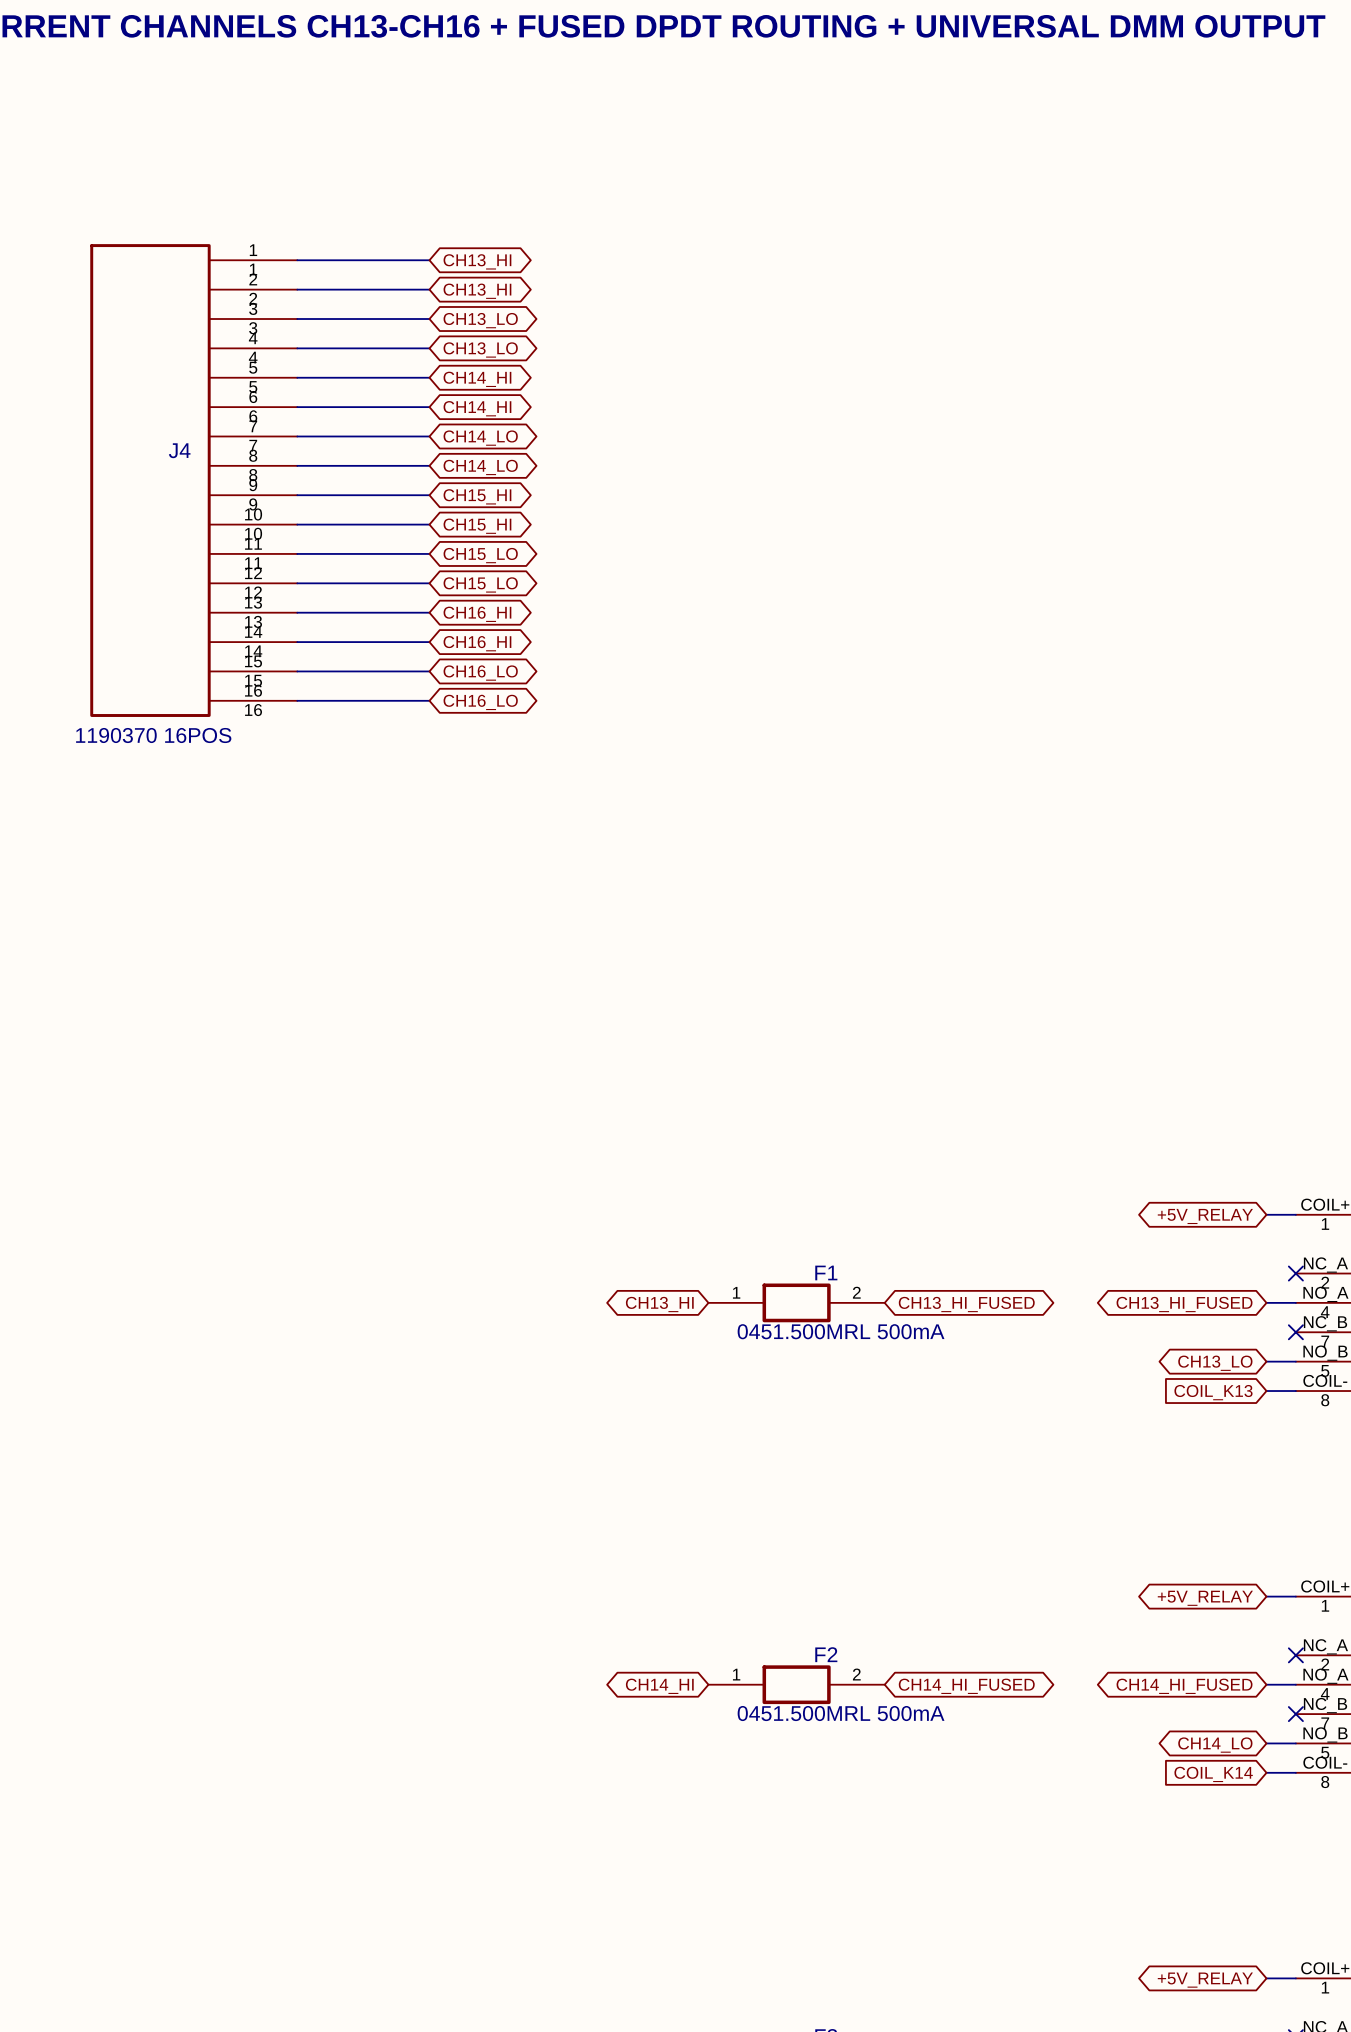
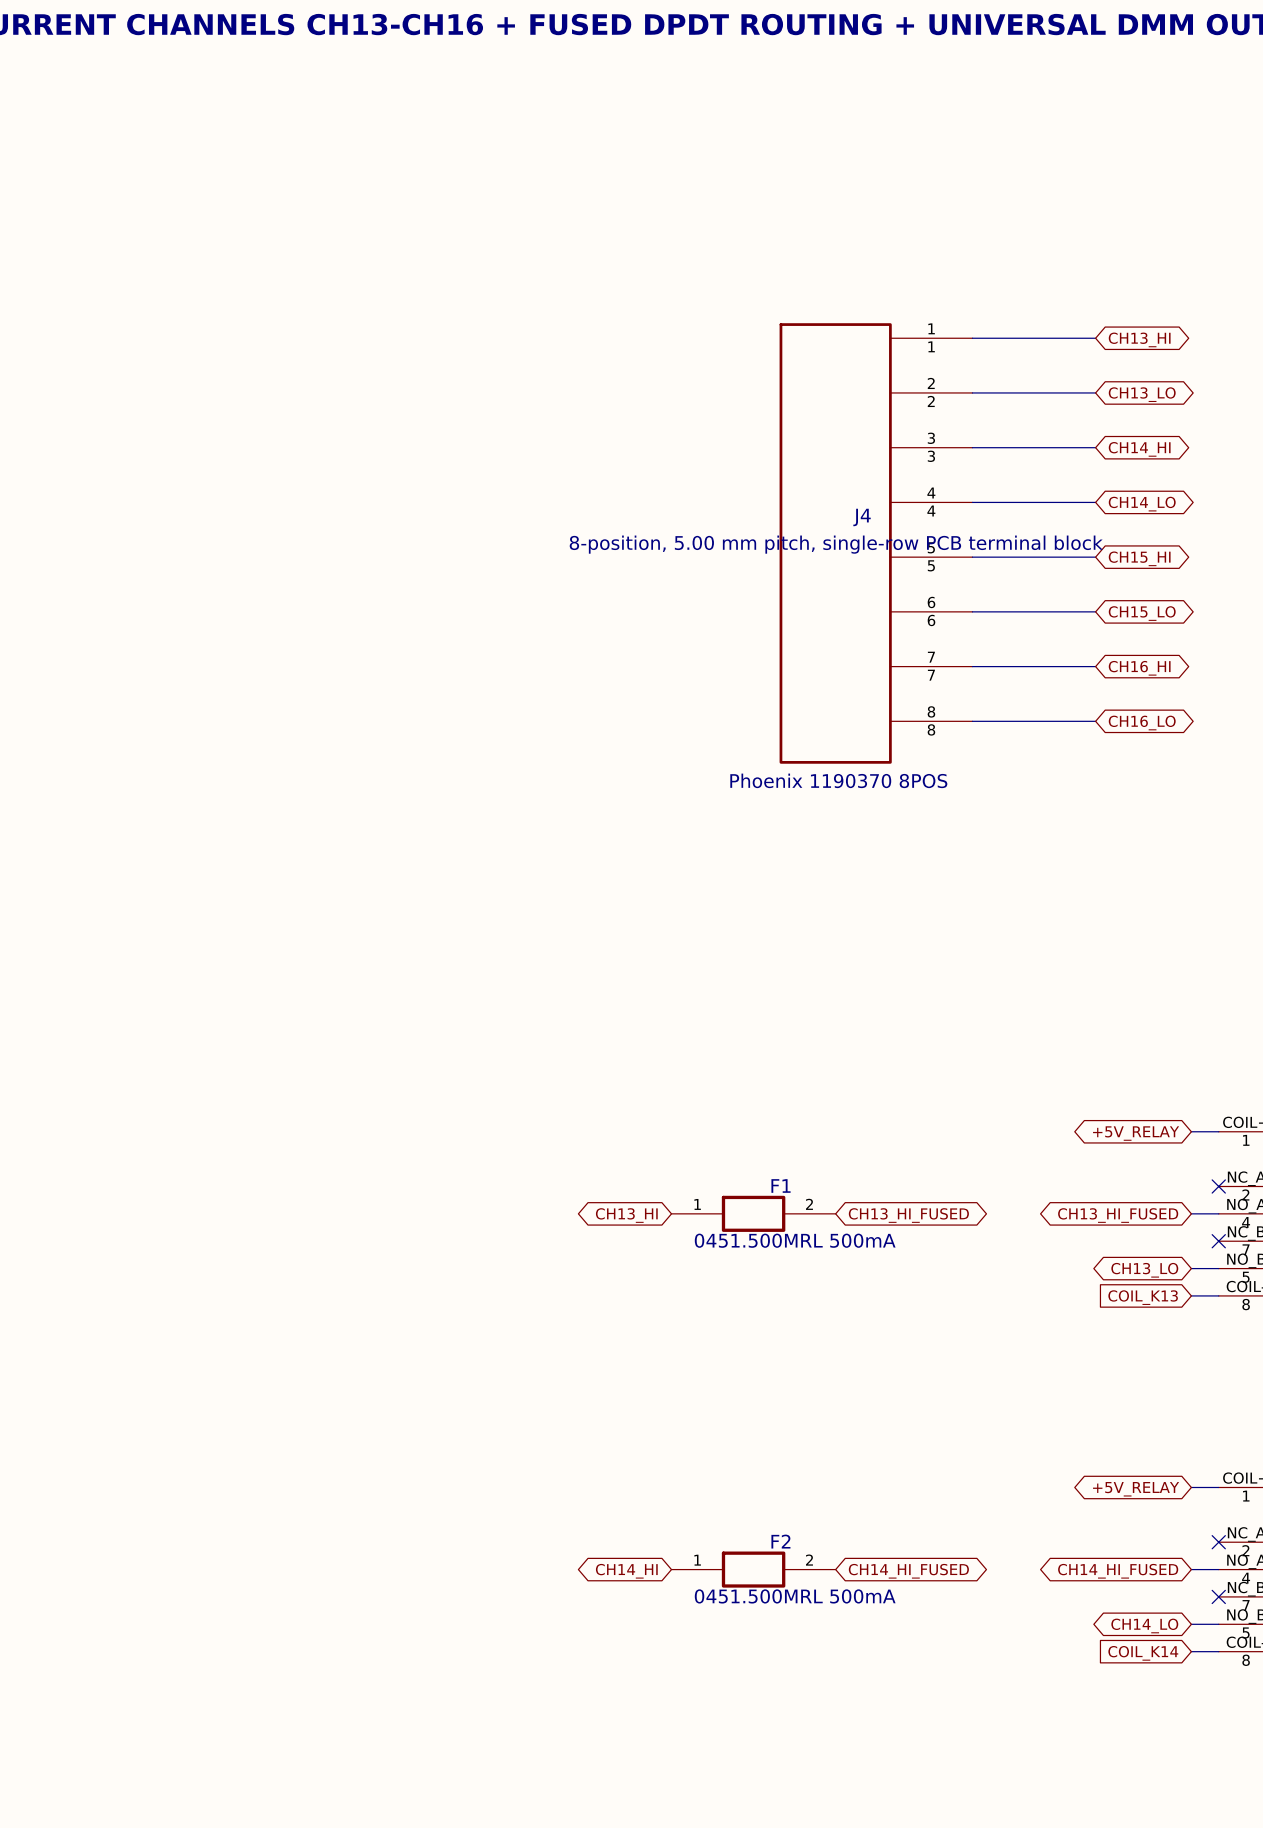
J4 symbol: [90, 244, 298, 717] -> [779, 323, 973, 764]
wire: (297, 260) (429, 260) -> none
global label: CH13_HI (477, 261) -> none
wire: (297, 289) (429, 289) -> none
global label: CH13_HI (477, 291) -> none
wire: (297, 319) (429, 319) -> none
global label: CH13_LO (480, 320) -> none
wire: (297, 348) (429, 348) -> none
global label: CH13_LO (480, 349) -> none
wire: none -> (972, 338) (1095, 338)
global label: none -> CH13_HI (1139, 339)
wire: (297, 377) (429, 377) -> none
global label: CH14_HI (477, 379) -> none
wire: (297, 407) (429, 407) -> none
global label: CH14_HI (477, 408) -> none
wire: none -> (972, 392) (1095, 392)
global label: none -> CH13_LO (1142, 394)
wire: (297, 436) (429, 436) -> none
global label: CH14_LO (480, 438) -> none
wire: (297, 465) (429, 465) -> none
global label: CH14_LO (480, 467) -> none
wire: none -> (972, 447) (1095, 447)
global label: none -> CH14_HI (1139, 449)
wire: (297, 495) (429, 495) -> none
global label: CH15_HI (477, 496) -> none
wire: (297, 524) (429, 524) -> none
global label: CH15_HI (477, 526) -> none
wire: none -> (972, 502) (1095, 502)
global label: none -> CH14_LO (1142, 504)
wire: (297, 553) (429, 553) -> none
global label: CH15_LO (480, 555) -> none
wire: (297, 583) (429, 583) -> none
global label: CH15_LO (480, 584) -> none
J4 text: none -> 8-position, 5.00 mm pitch, single-row PCB terminal block (836, 544)
wire: none -> (972, 557) (1095, 557)
global label: none -> CH15_HI (1139, 558)
wire: (297, 612) (429, 612) -> none
global label: CH16_HI (477, 614) -> none
wire: (297, 642) (429, 642) -> none
global label: CH16_HI (477, 643) -> none
wire: none -> (972, 611) (1095, 611)
global label: none -> CH15_LO (1142, 613)
wire: (297, 671) (429, 671) -> none
global label: CH16_LO (480, 673) -> none
wire: (297, 700) (429, 700) -> none
global label: CH16_LO (480, 702) -> none
wire: none -> (972, 666) (1095, 666)
global label: none -> CH16_HI (1139, 668)
J4 value: 1190370 16POS (153, 735) -> Phoenix 1190370 8POS (838, 780)
wire: none -> (972, 721) (1095, 721)
global label: none -> CH16_LO (1142, 723)

